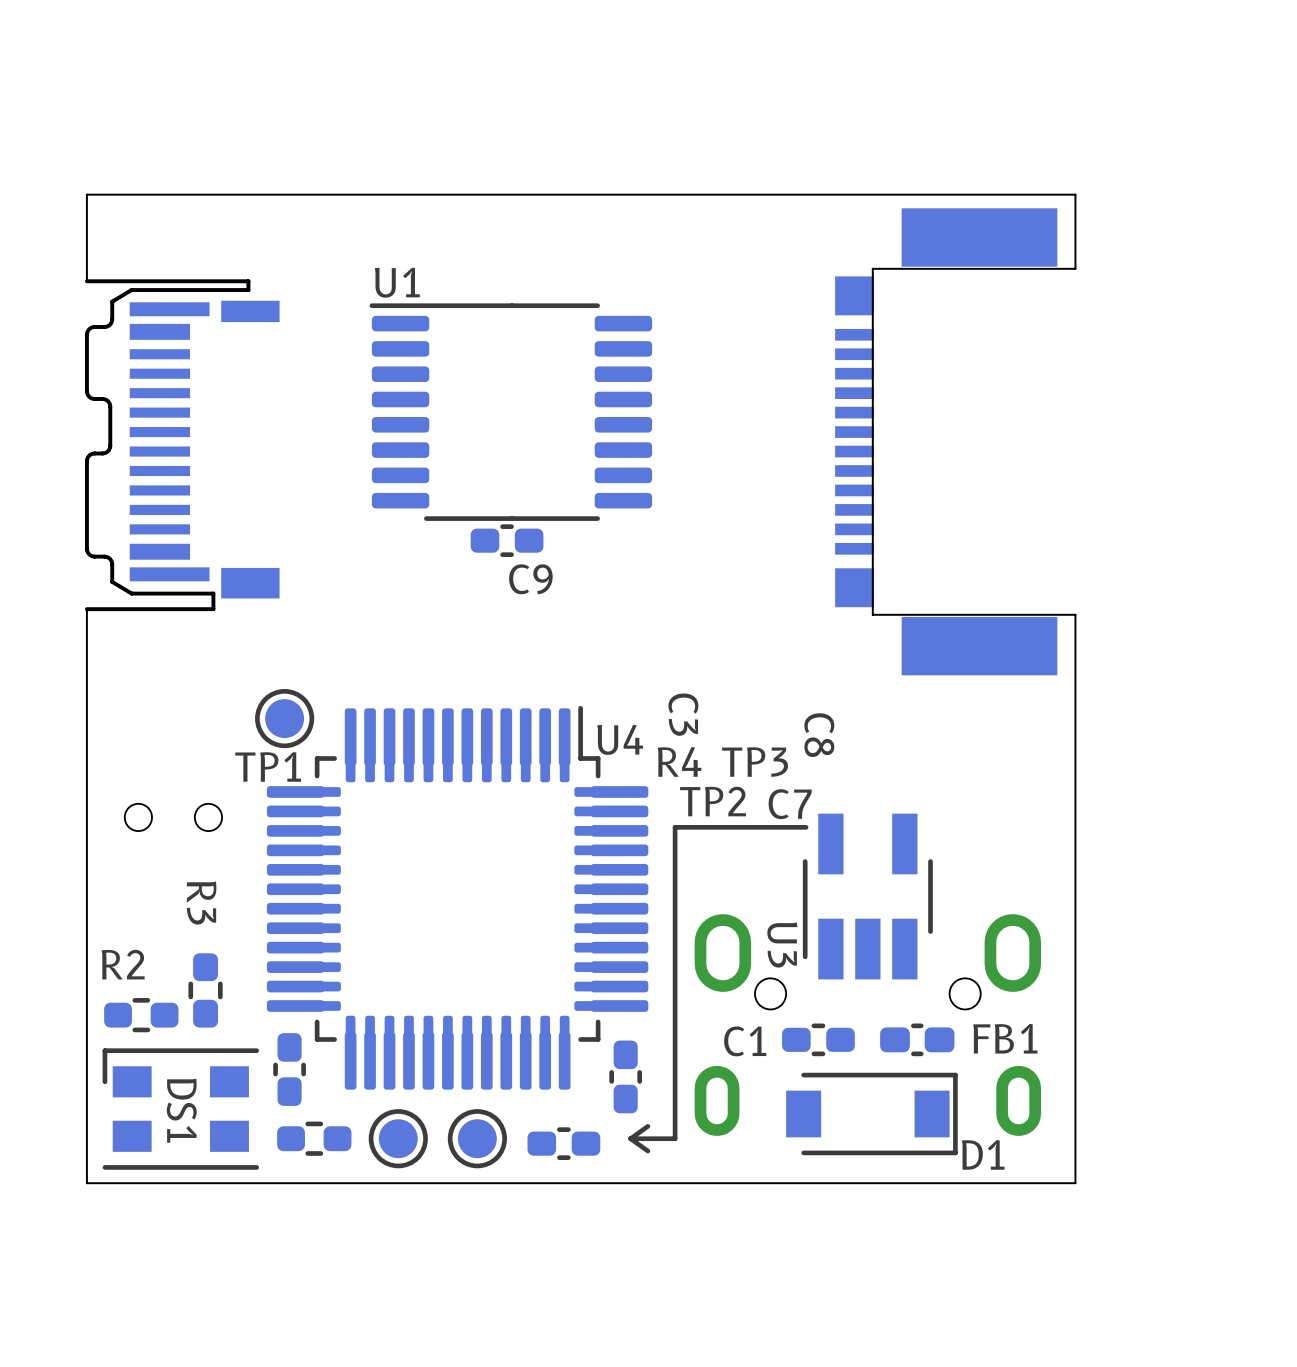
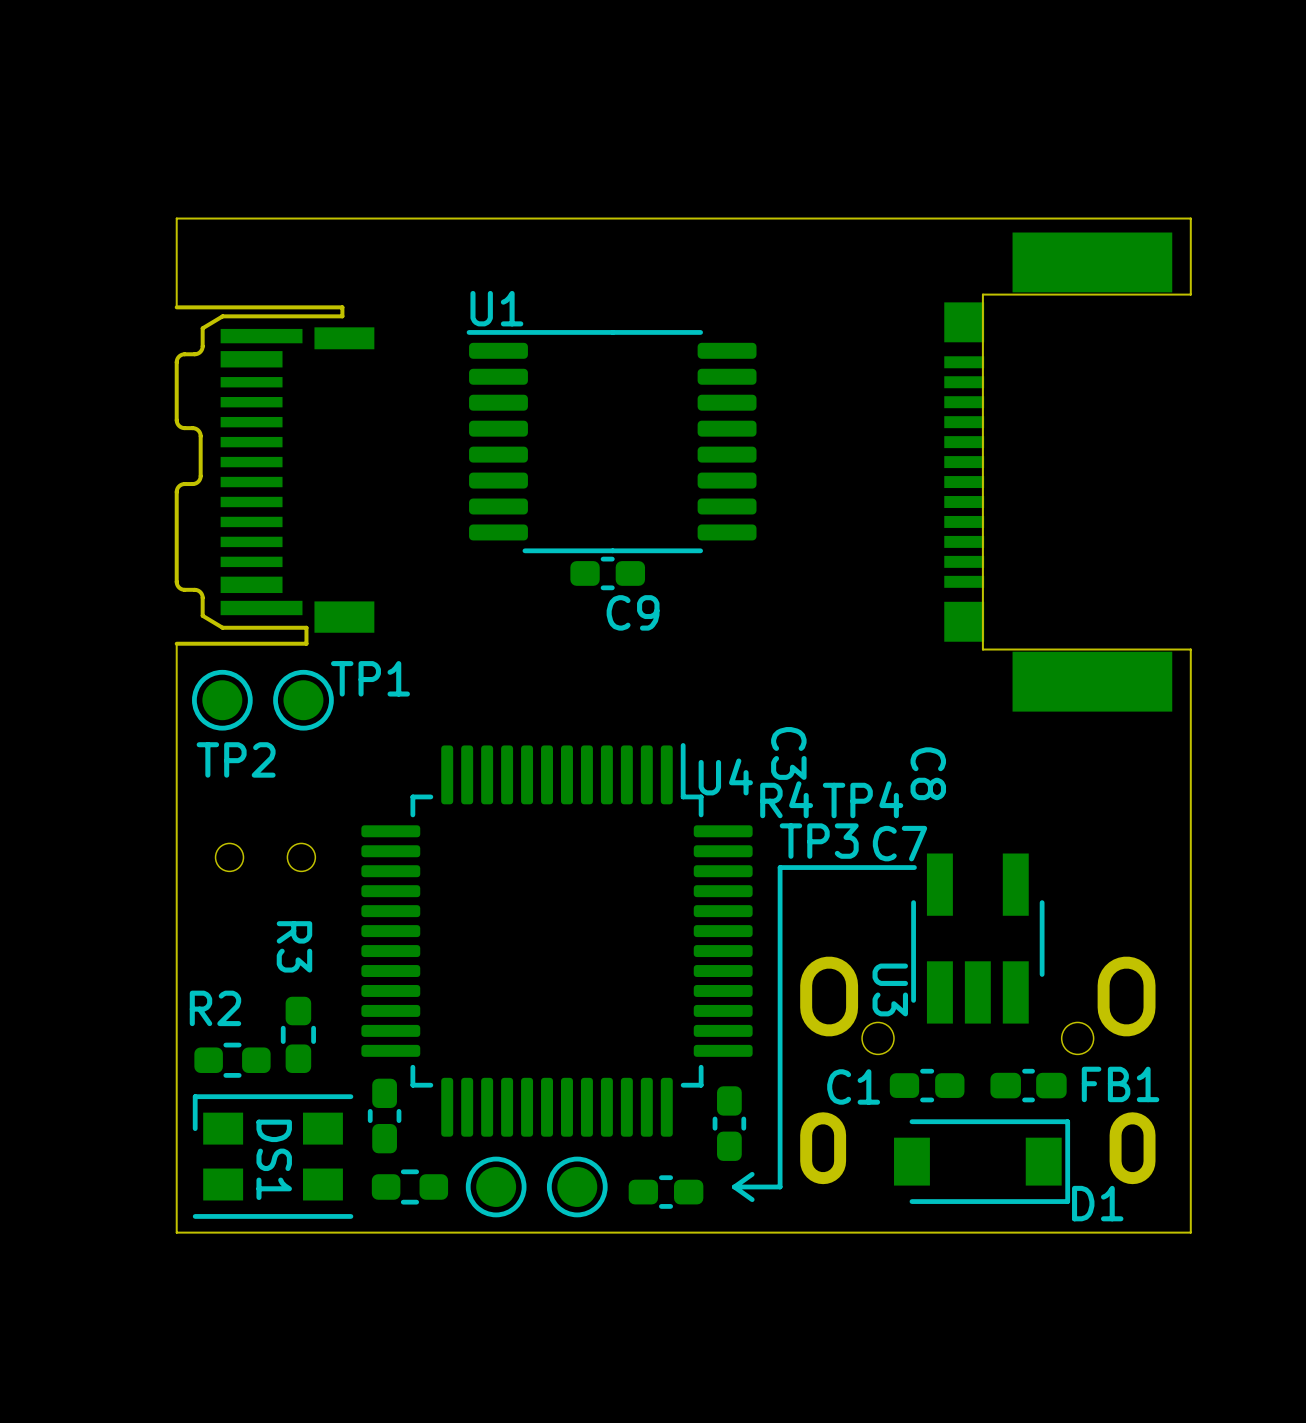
TP2: none -> (222, 700)
U4 footprint: [266, 705, 649, 1090] -> [361, 743, 753, 1137]
TP1 position: (284, 718) -> (303, 700)
TP3 name: TP3 (755, 762) -> TP4 (863, 799)
TP1 name position: TP1 (268, 766) -> TP1 (370, 678)
TP2 name: TP2 (713, 801) -> TP3 (819, 841)

